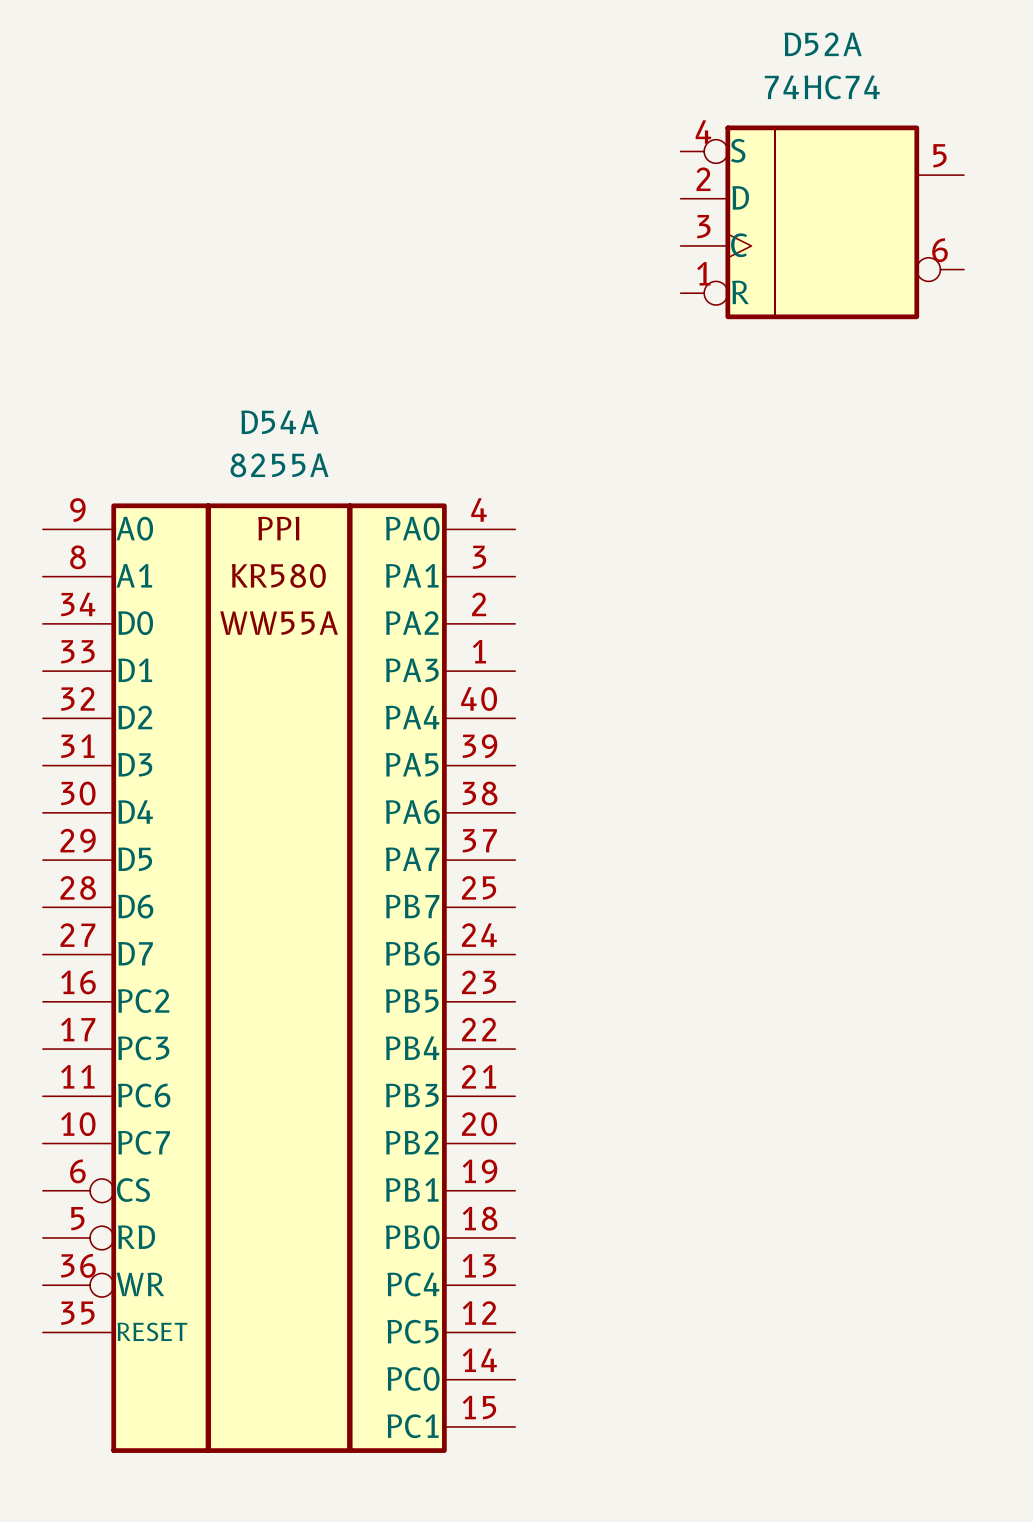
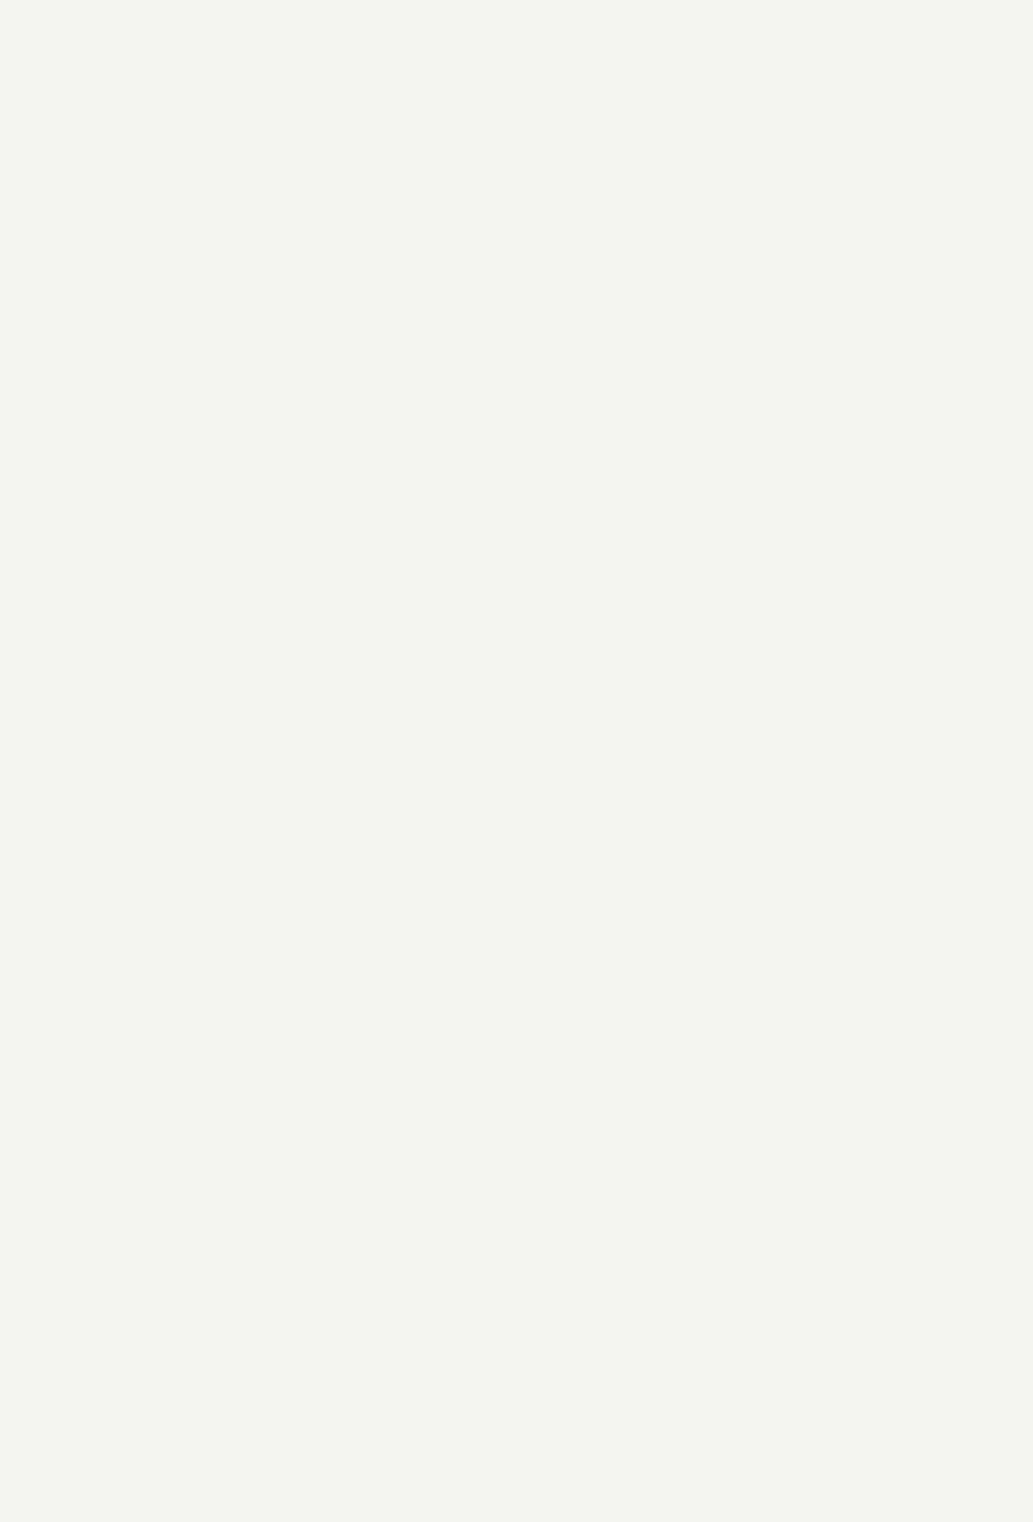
D52A: 74HC74 (822, 222) -> none
D54A: 8255A (279, 978) -> none

